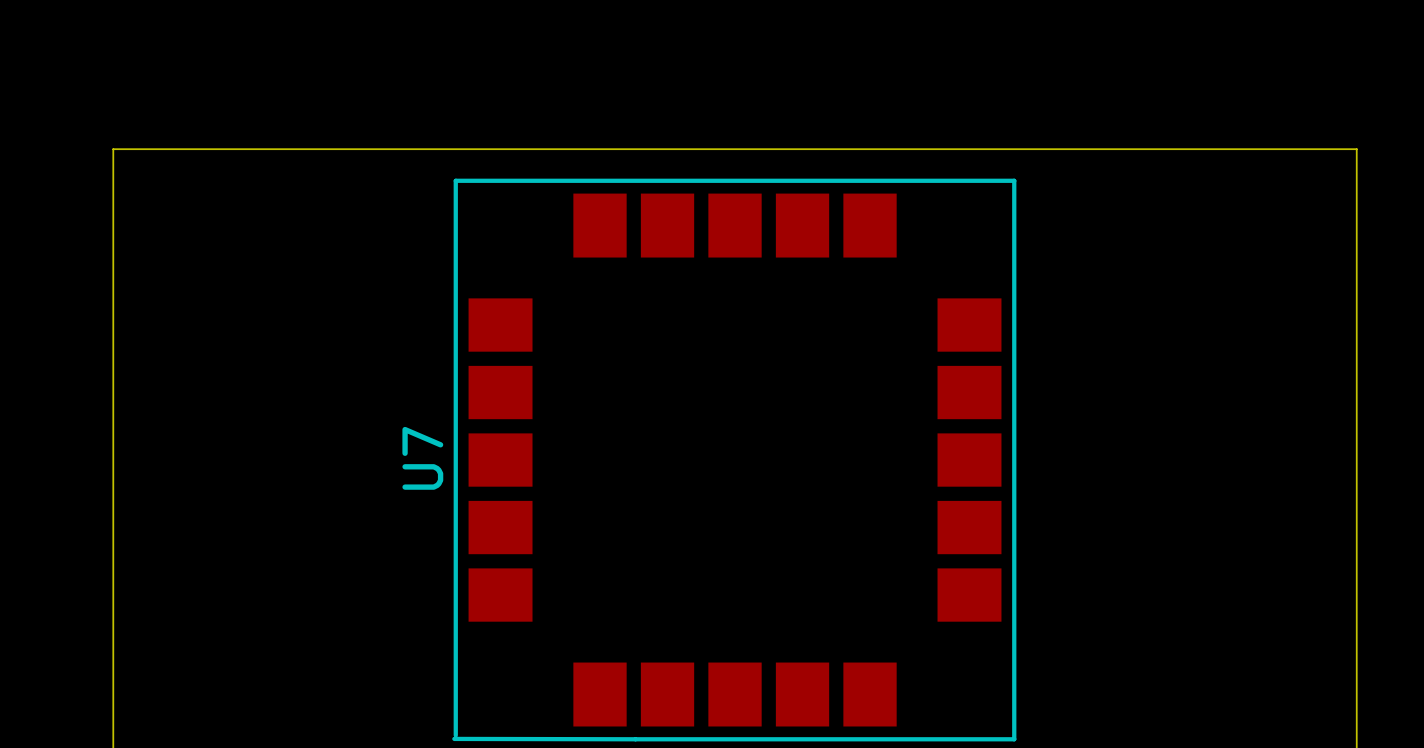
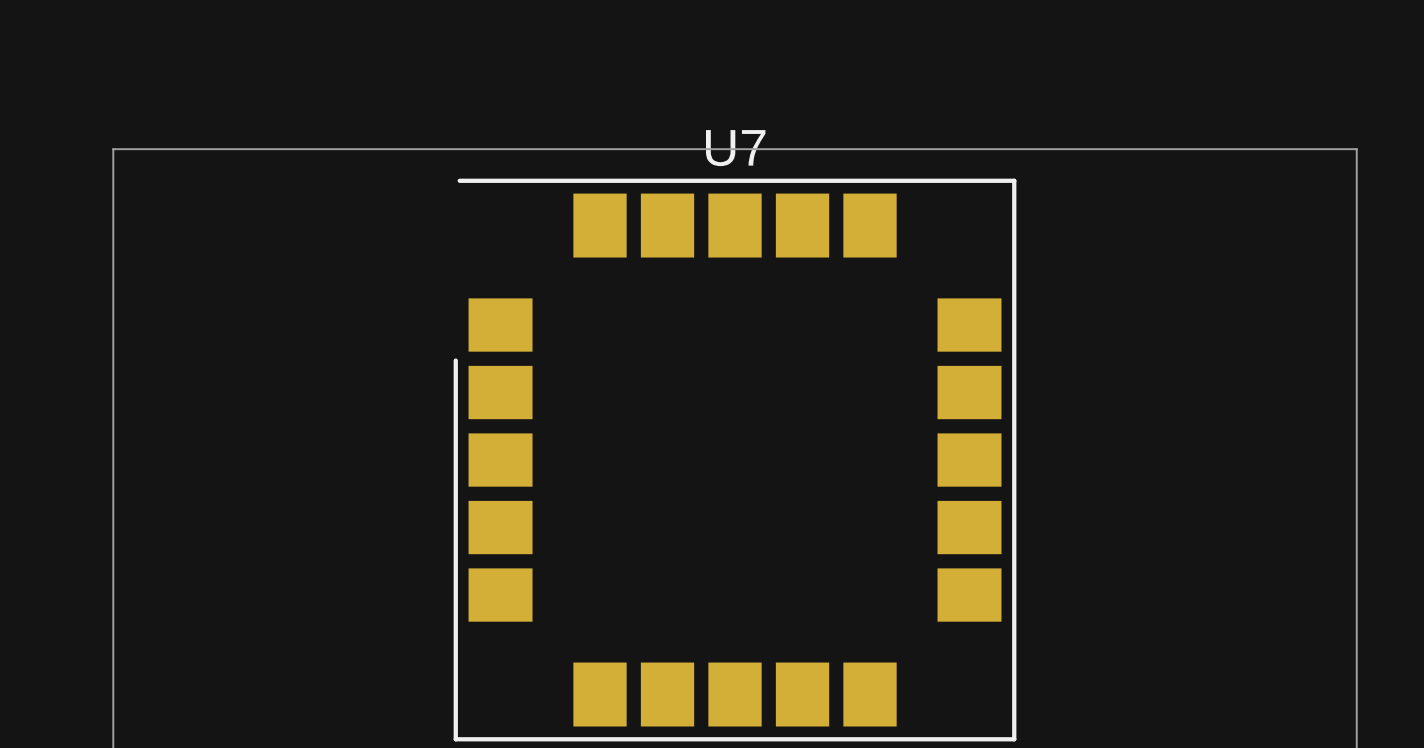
U7 rotation: 0° (735, 460) -> 90° clockwise (735, 460)
line: (454, 738) (635, 739) -> none

